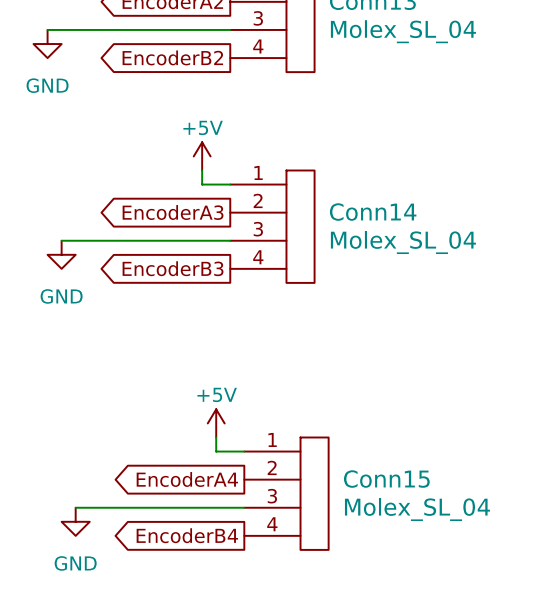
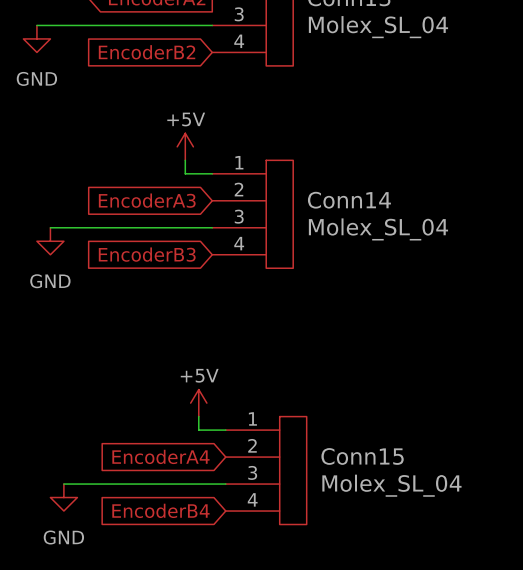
global label shape: output (172, 57) -> input (147, 52)
global label shape: output (173, 212) -> input (147, 200)
global label shape: output (173, 268) -> input (147, 254)
global label shape: output (187, 479) -> input (160, 456)
global label shape: output (187, 535) -> input (160, 510)

